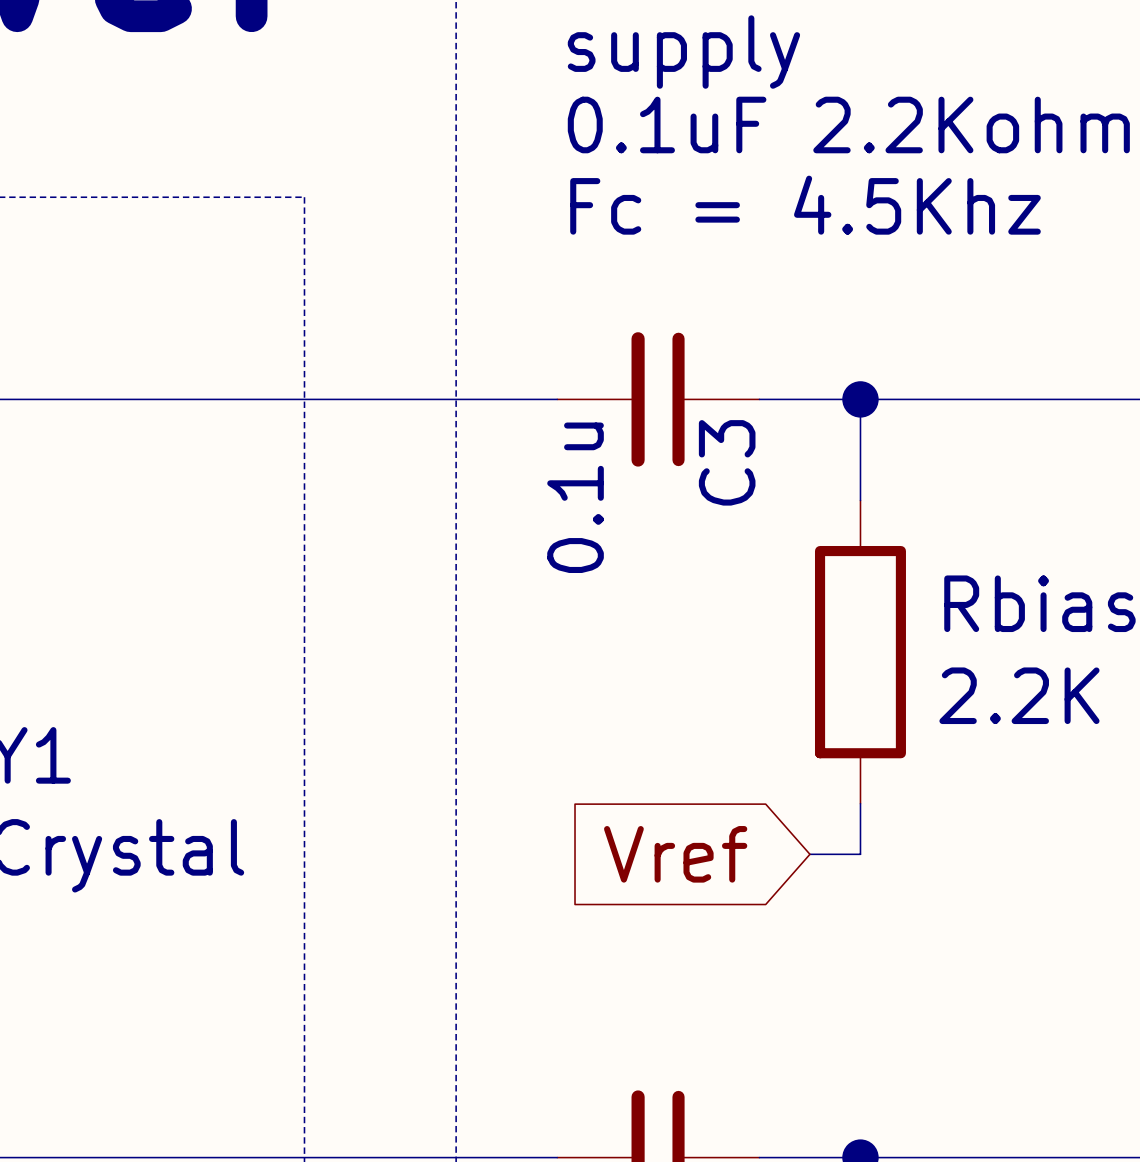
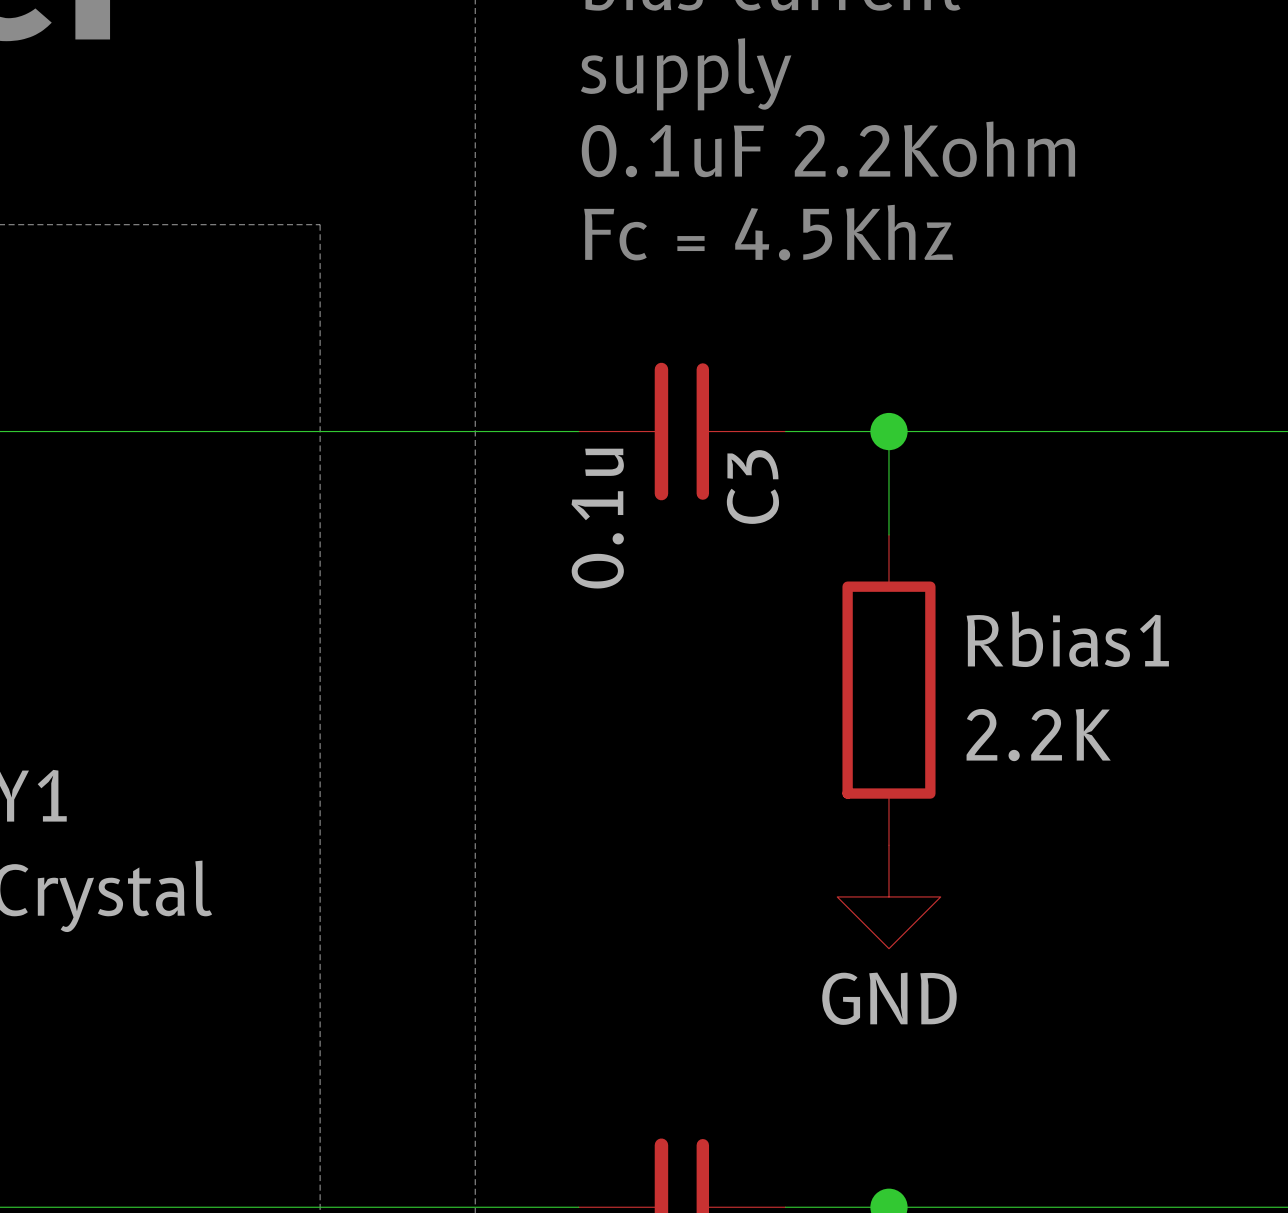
global label: Vref (675, 854) -> none
power symbol: none -> GND (888, 896)

